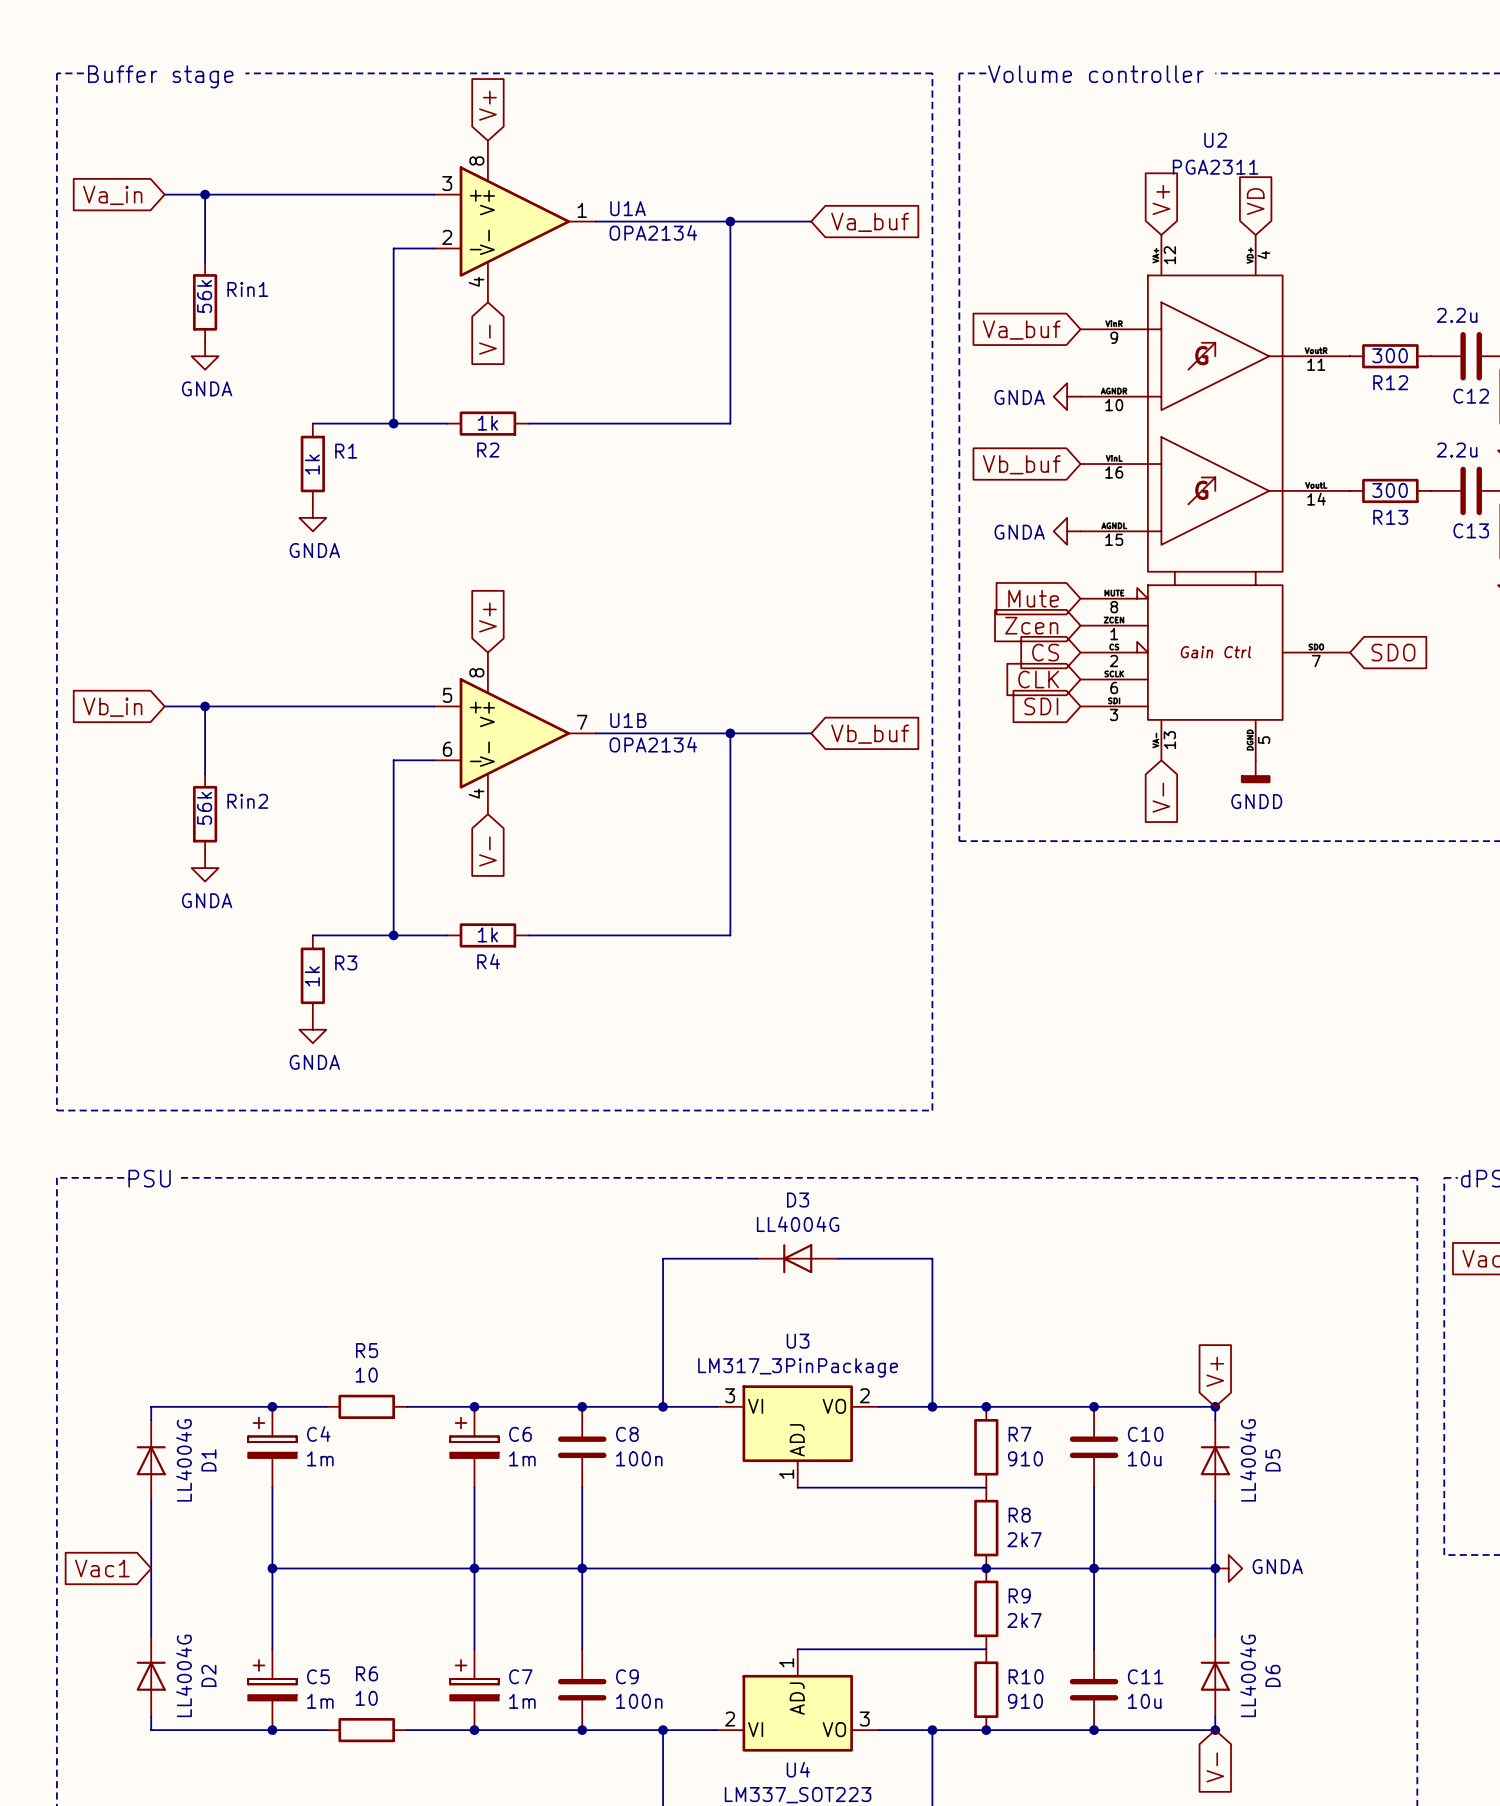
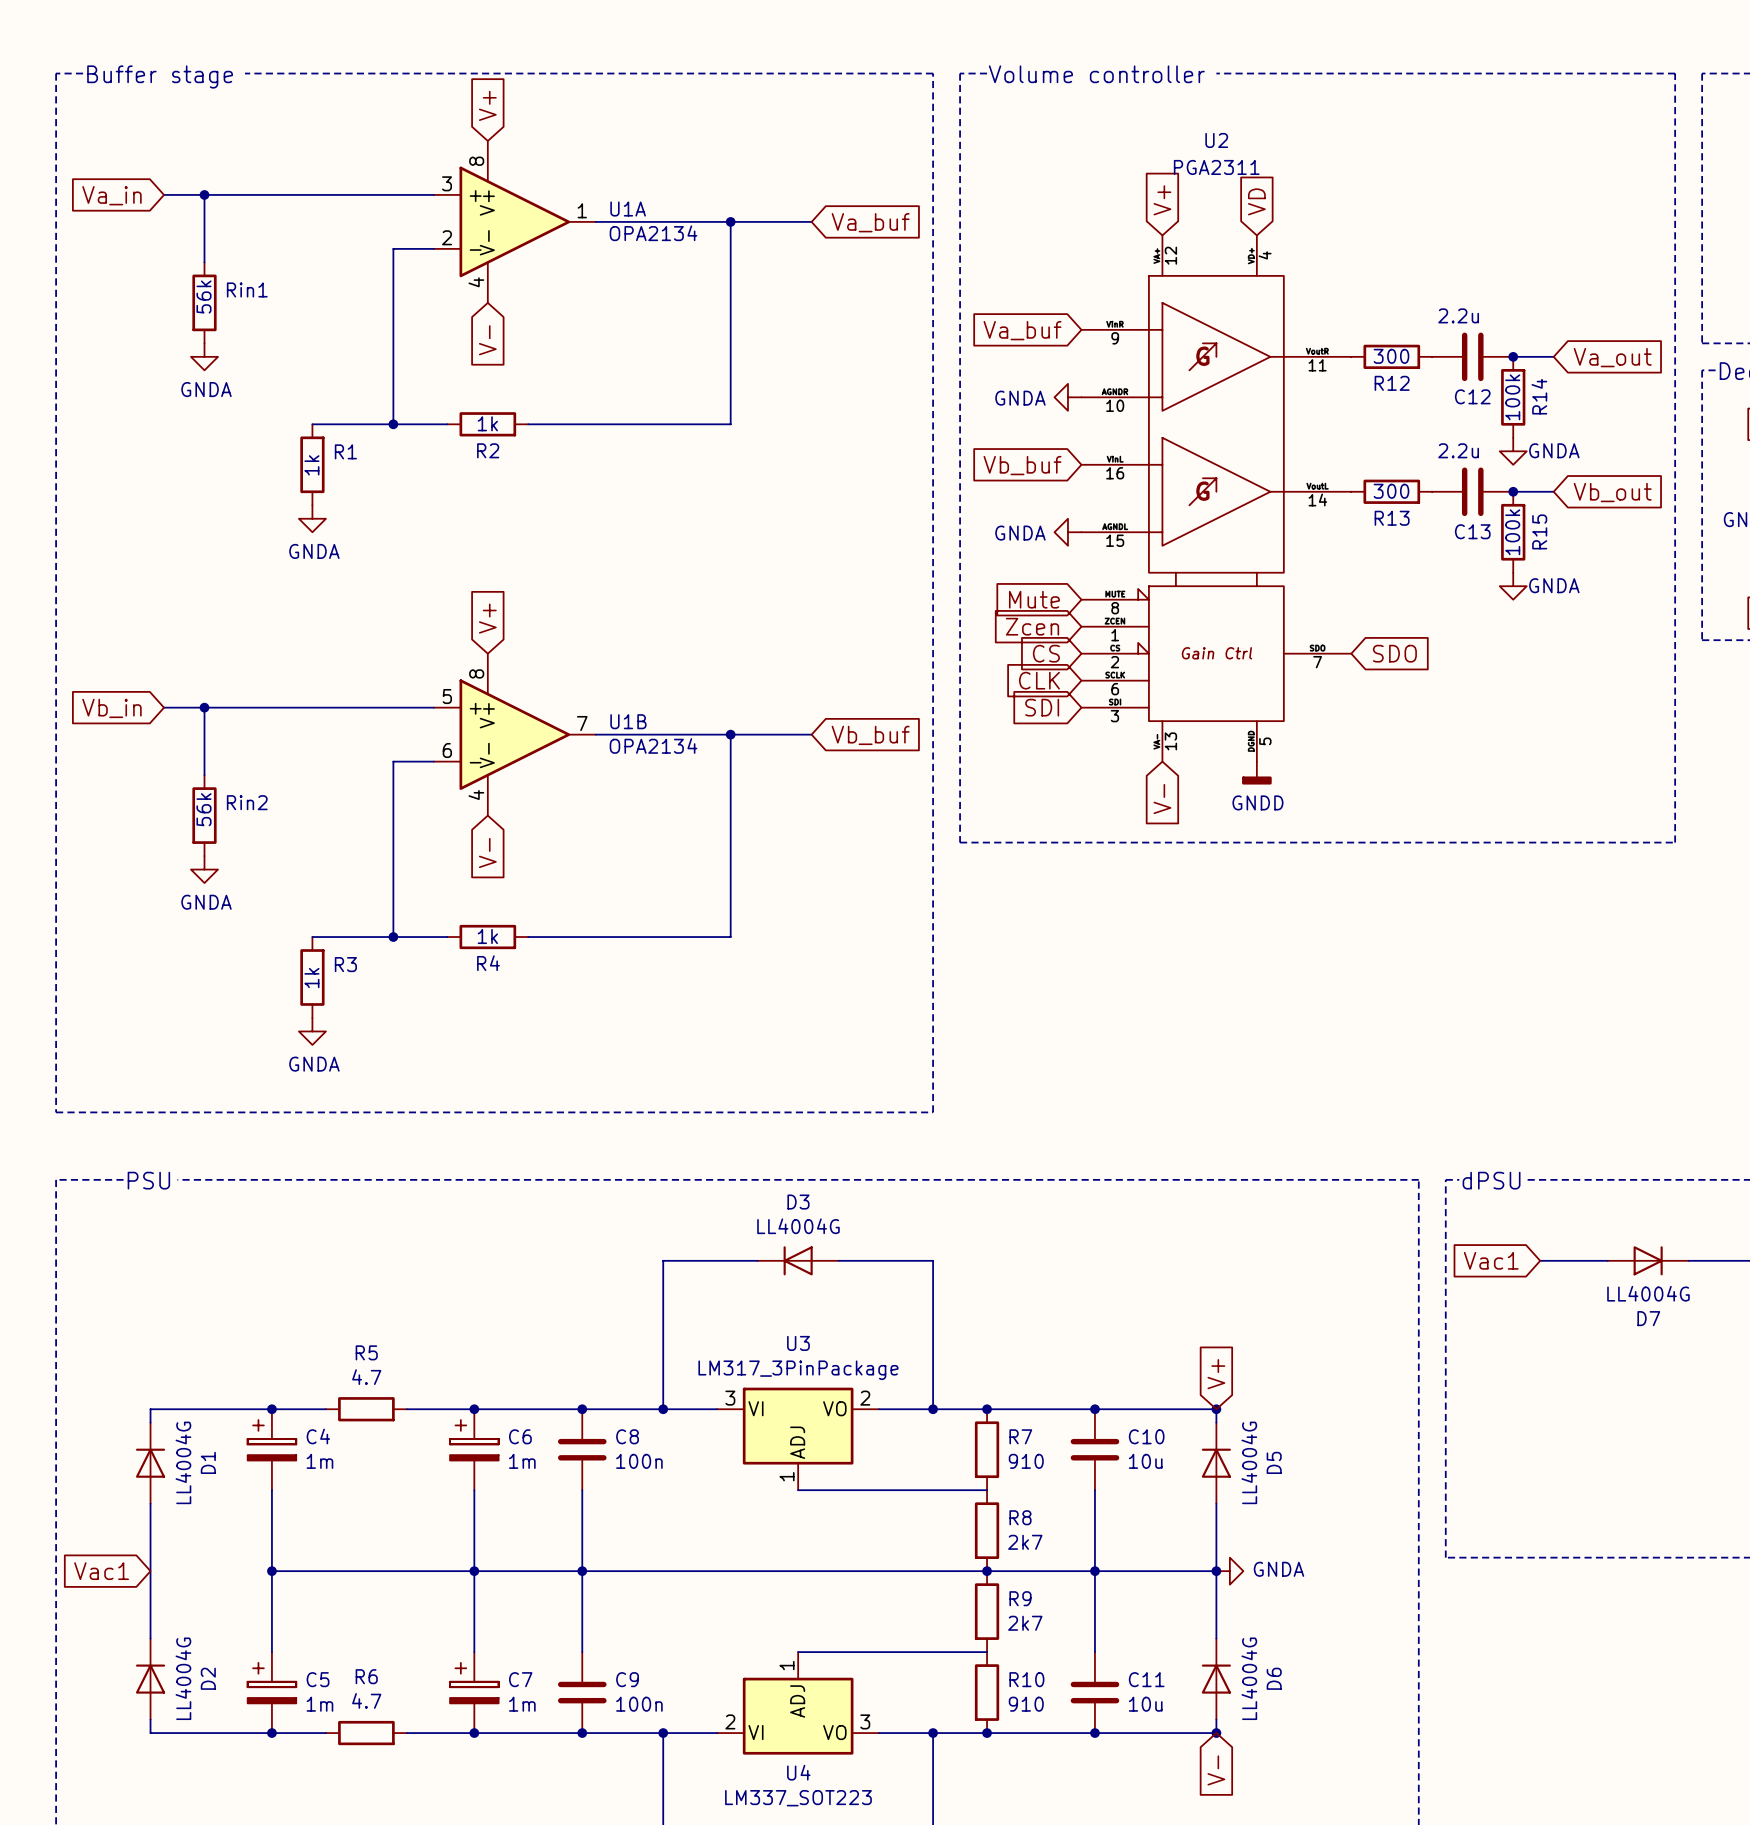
R5 value: 10 (366, 1375) -> 4.7 (366, 1377)
R6 value: 10 (366, 1698) -> 4.7 (366, 1700)

